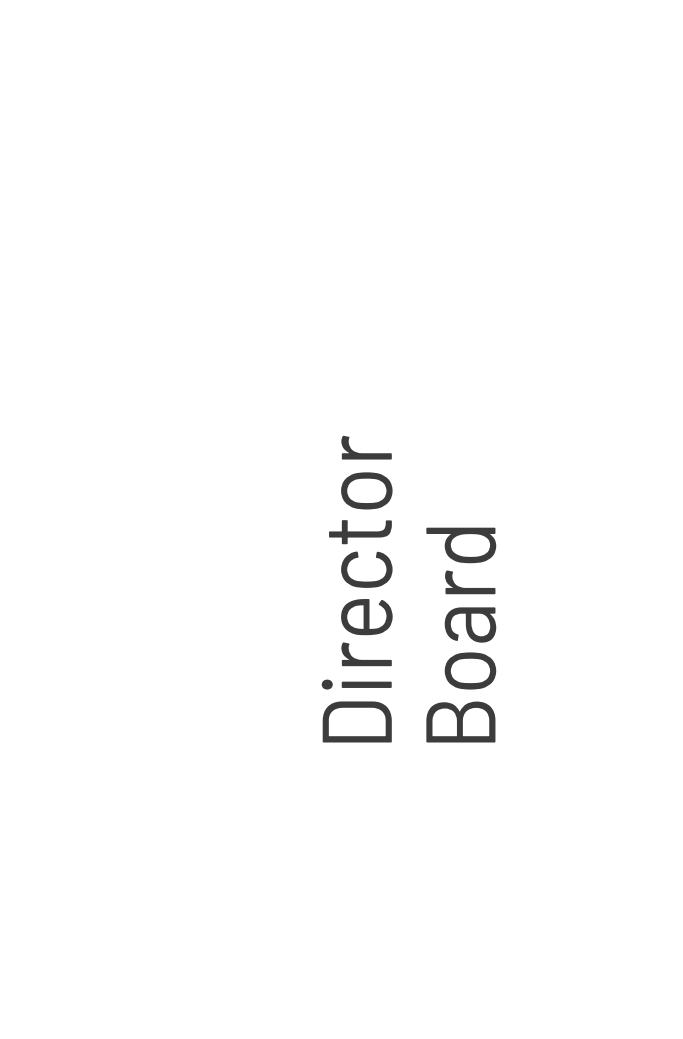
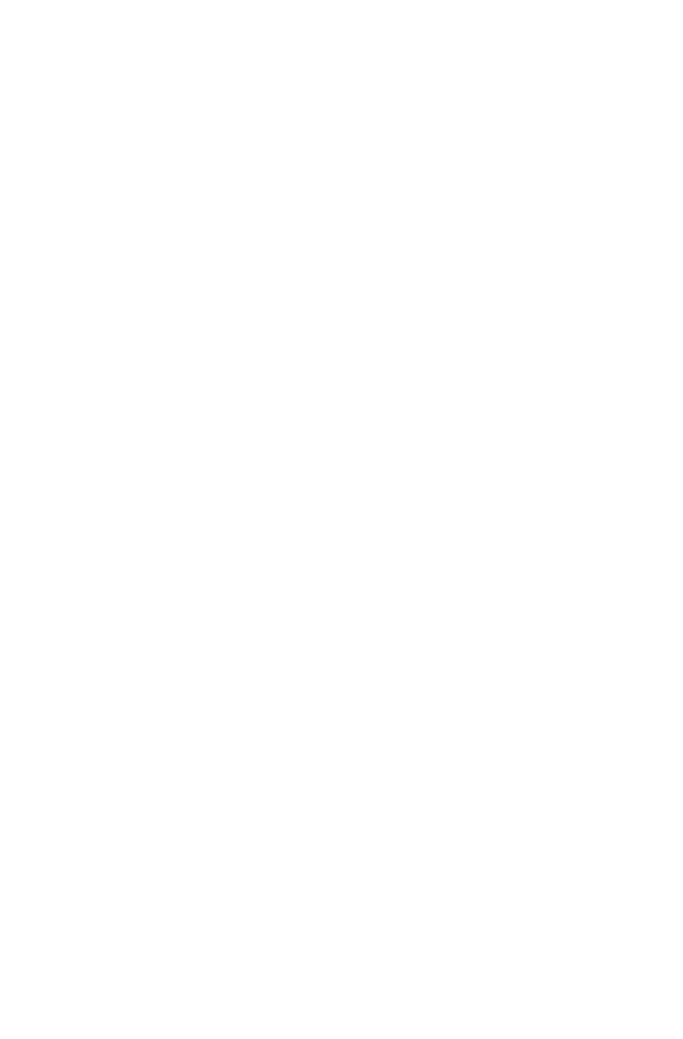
text: Director (357, 589) -> none
text: Board (461, 635) -> none

